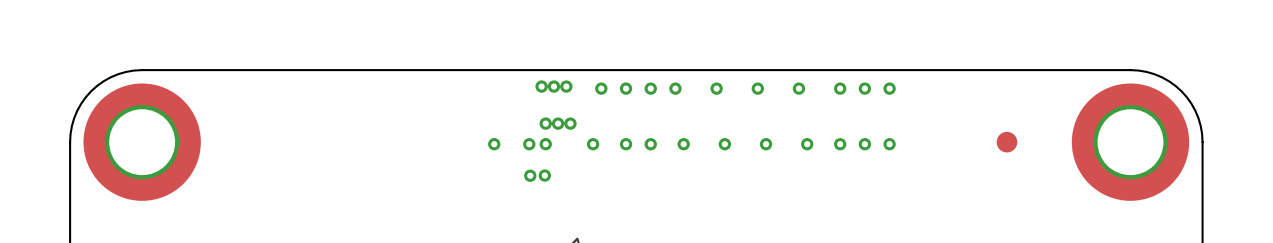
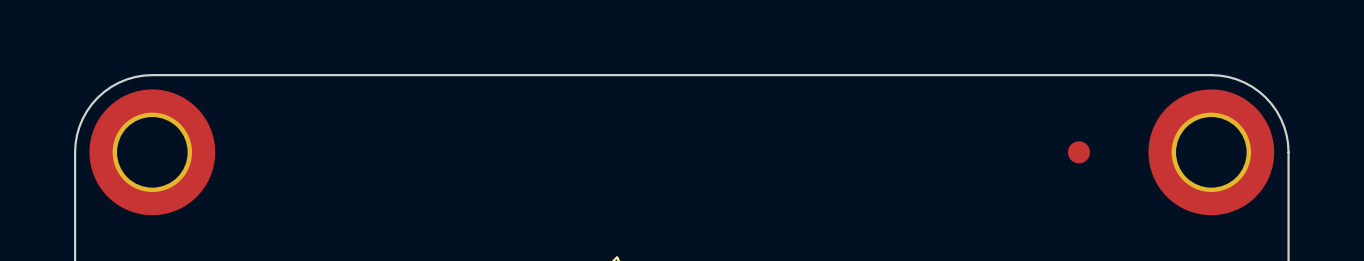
via: (541, 86) -> none
via: (553, 86) -> none
via: (566, 86) -> none
via: (601, 88) -> none
via: (626, 88) -> none
via: (650, 88) -> none
via: (675, 88) -> none
via: (716, 88) -> none
via: (757, 88) -> none
via: (799, 88) -> none
via: (840, 88) -> none
via: (864, 88) -> none
via: (889, 88) -> none
via: (545, 123) -> none
via: (558, 123) -> none
via: (570, 123) -> none
via: (494, 144) -> none
via: (529, 144) -> none
via: (545, 144) -> none
via: (593, 144) -> none
via: (626, 144) -> none
via: (650, 144) -> none
via: (683, 144) -> none
via: (724, 144) -> none
via: (766, 144) -> none
via: (807, 144) -> none
via: (840, 144) -> none
via: (864, 144) -> none
via: (889, 144) -> none
via: (530, 175) -> none
via: (544, 175) -> none

